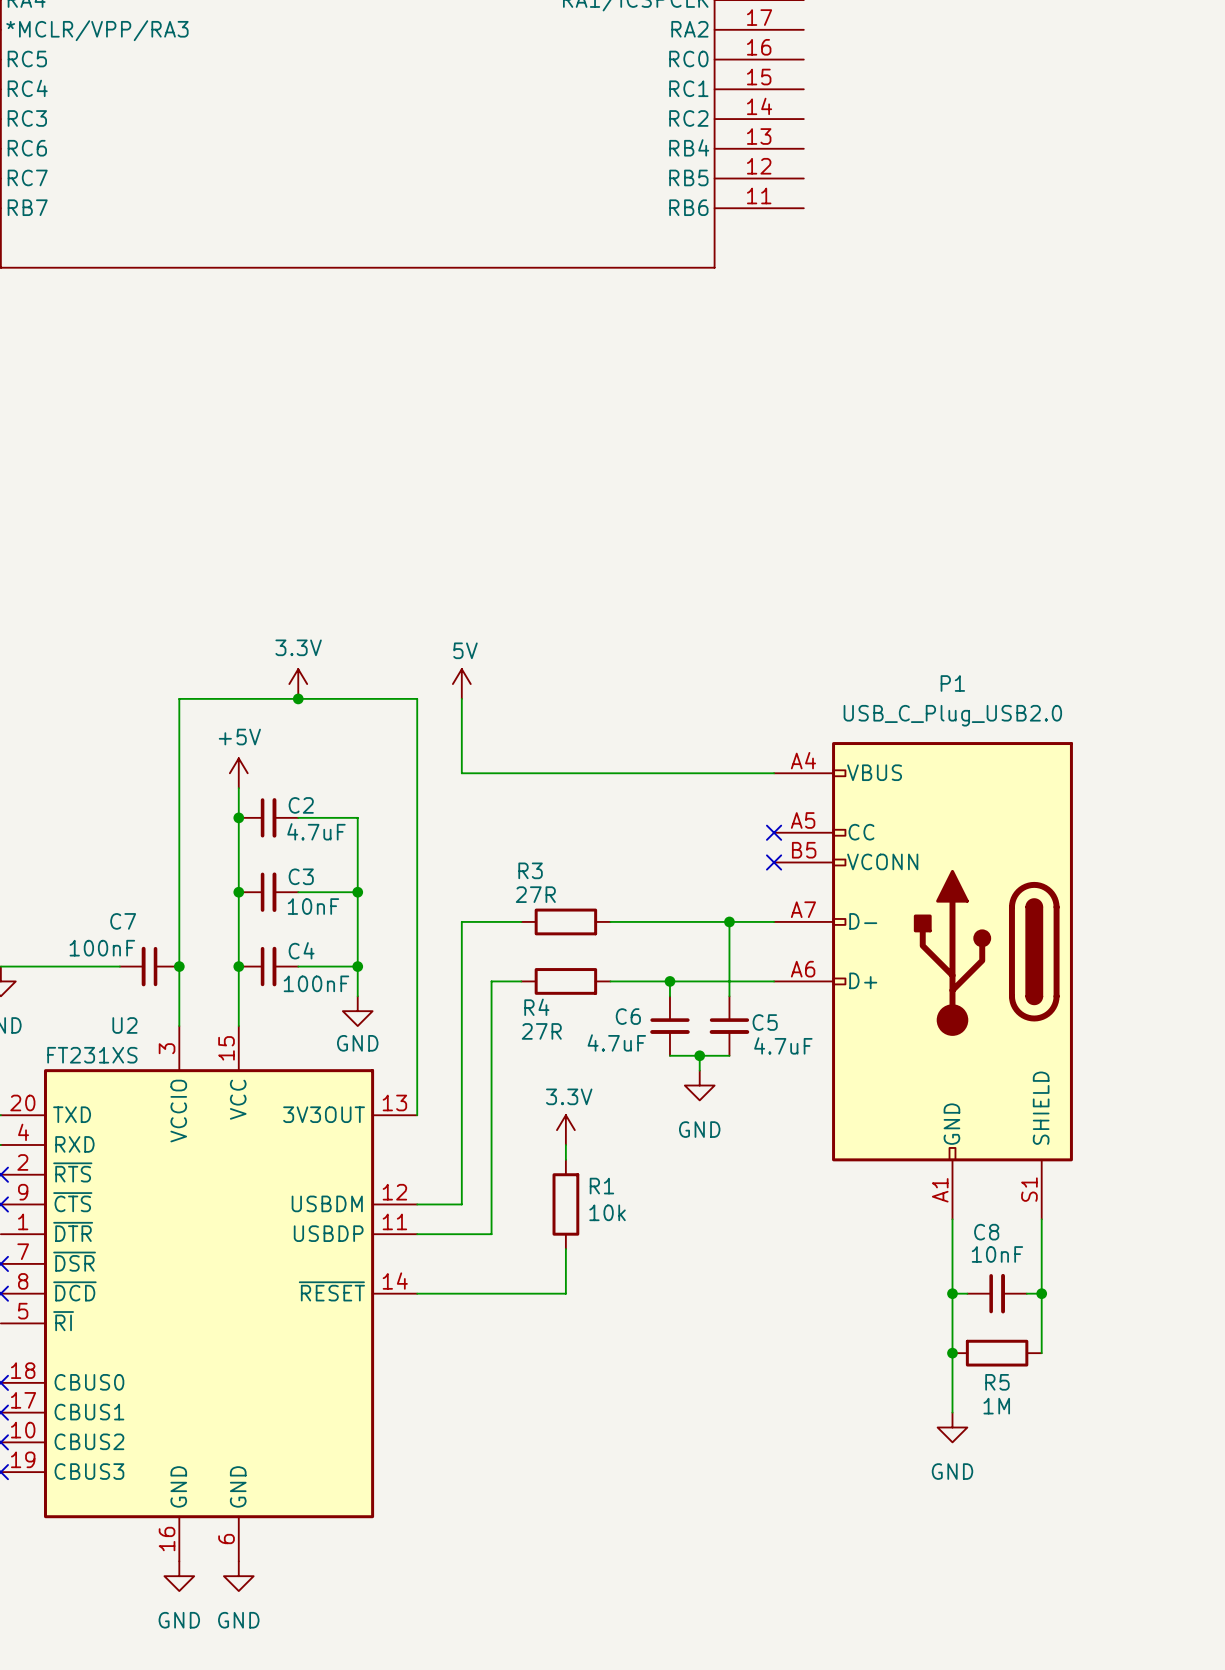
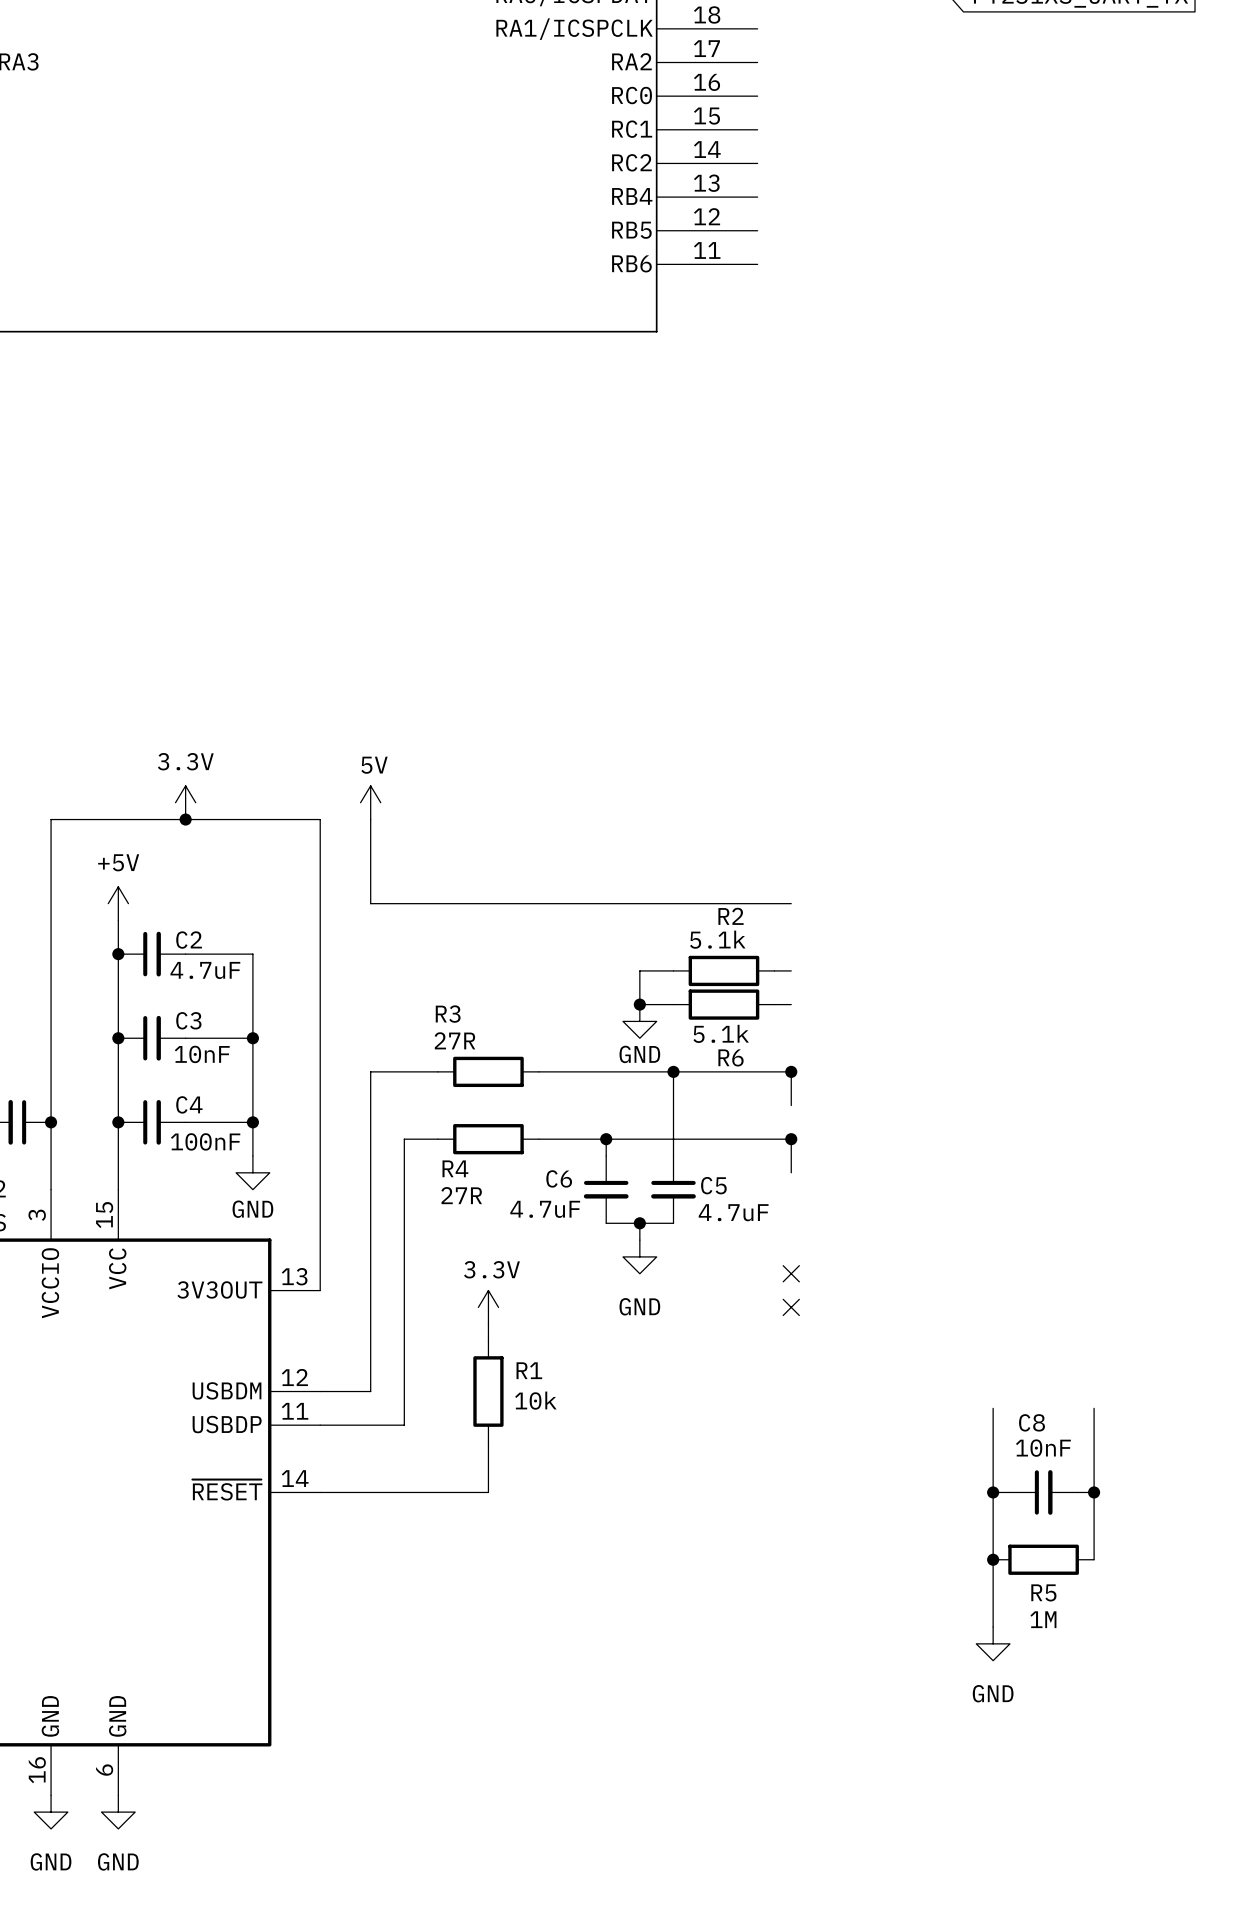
wire: none -> (673, 970) (639, 970) (639, 1004) (673, 1004)
no-connect mark: (774, 832) -> none
R2: none -> 5.1k (723, 970)
junction: none -> (639, 1004)
no-connect mark: (774, 862) -> none
R6: none -> 5.1k (723, 1004)
power symbol: none -> GND (639, 1021)
junction: none -> (791, 1071)
P1: USB_C_Plug_USB2.0 (923, 980) -> none
junction: none -> (791, 1139)
no-connect mark: none -> (791, 1273)
no-connect mark: none -> (791, 1307)
wire: (952, 1219) (952, 1412) -> (993, 1408) (993, 1627)
wire: (1041, 1219) (1041, 1353) -> (1094, 1408) (1094, 1559)
wire: (952, 1293) (967, 1293) -> (1077, 1492) (1094, 1492)
junction: (952, 1293) -> none
C8 position: (997, 1293) -> (1043, 1492)
junction: none -> (993, 1492)
junction: (1041, 1293) -> none
junction: none -> (1094, 1492)
junction: (952, 1353) -> none
R5 position: (997, 1353) -> (1043, 1559)
junction: none -> (993, 1559)
power symbol position: GND (952, 1427) -> GND (993, 1643)

